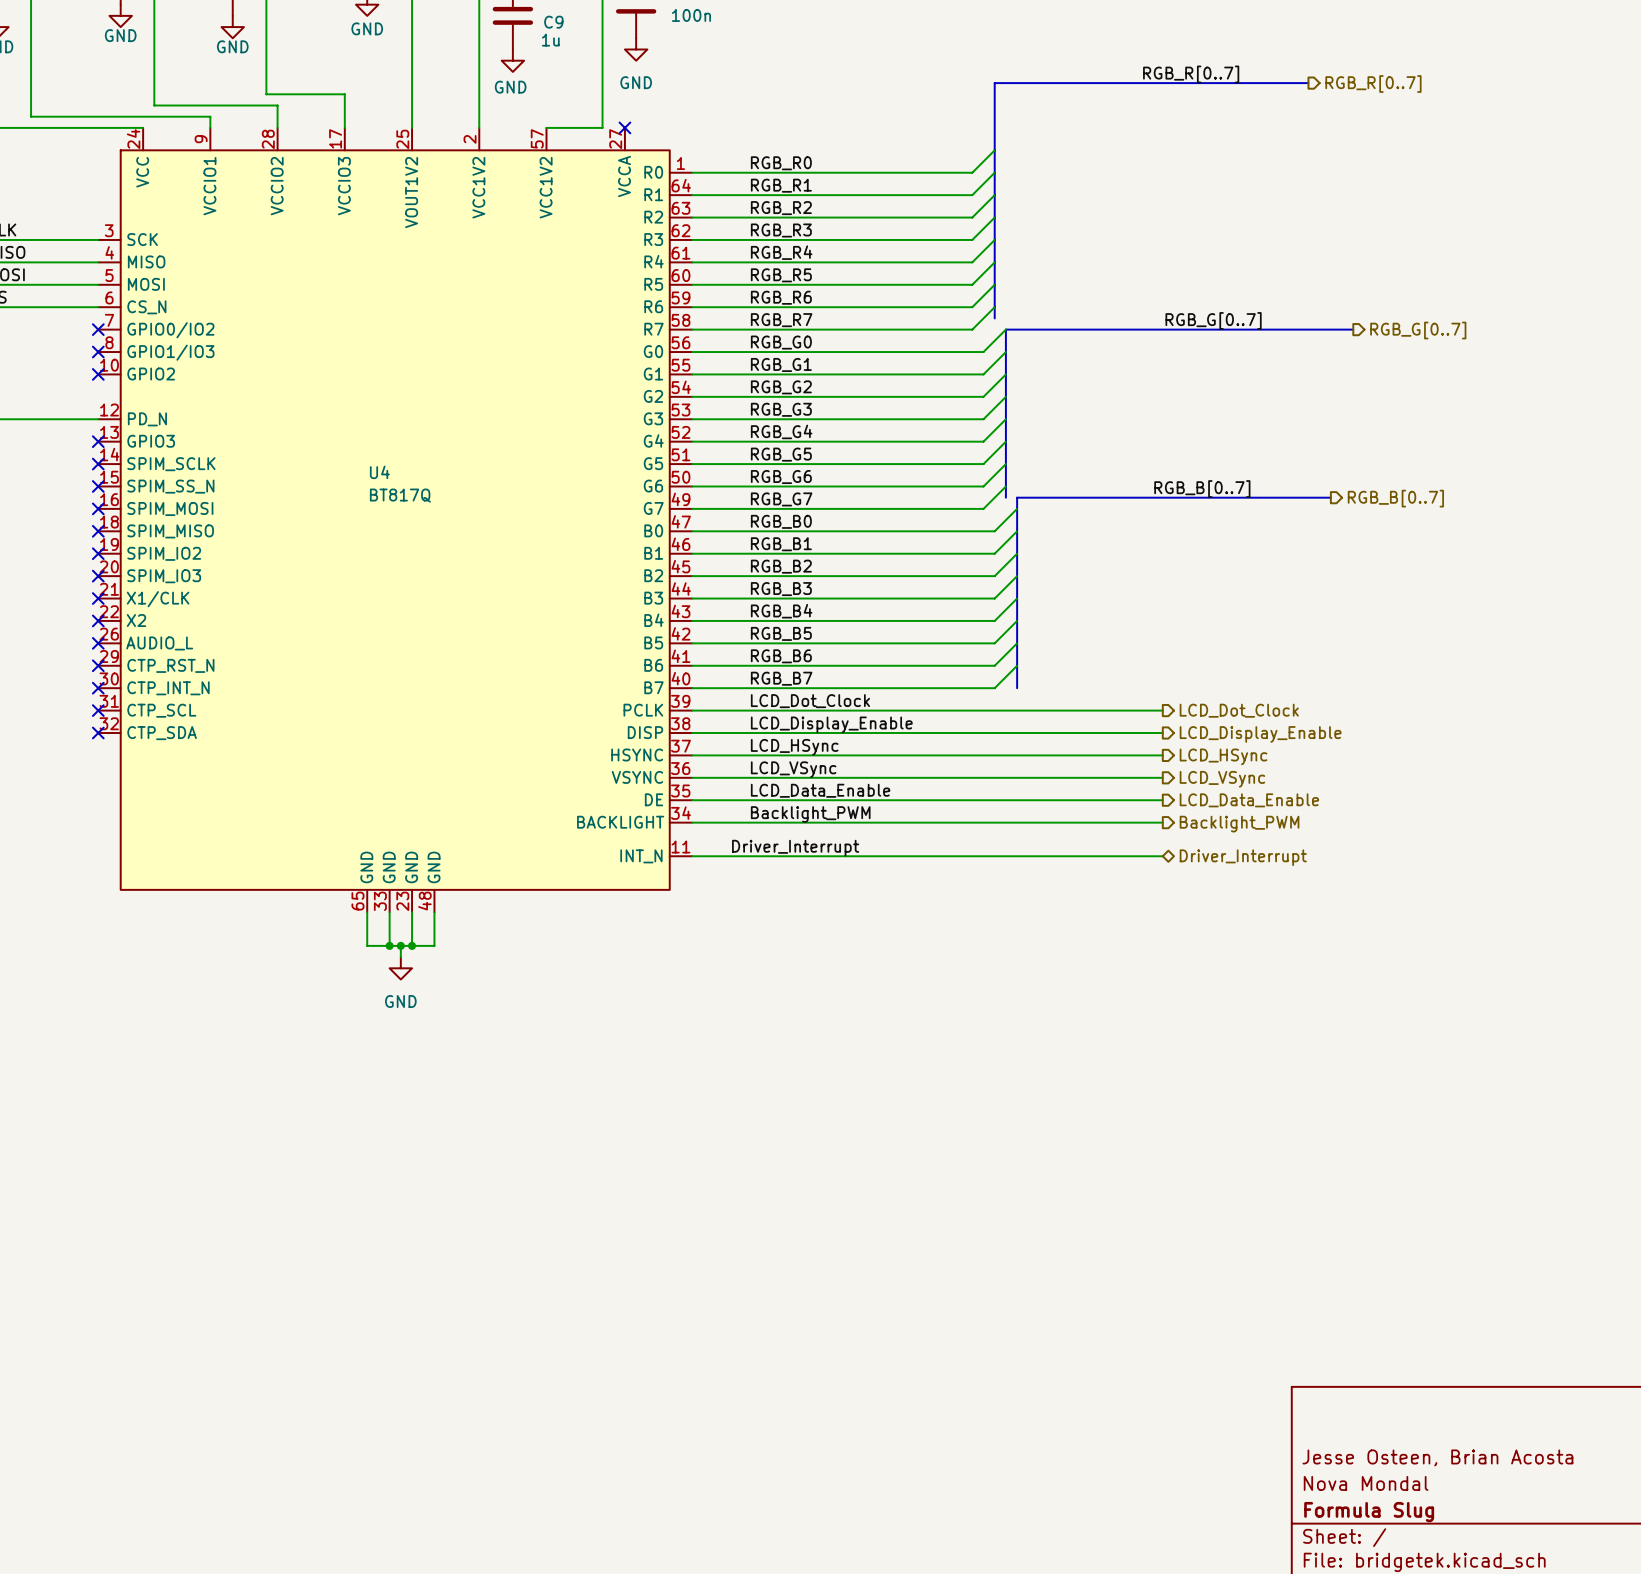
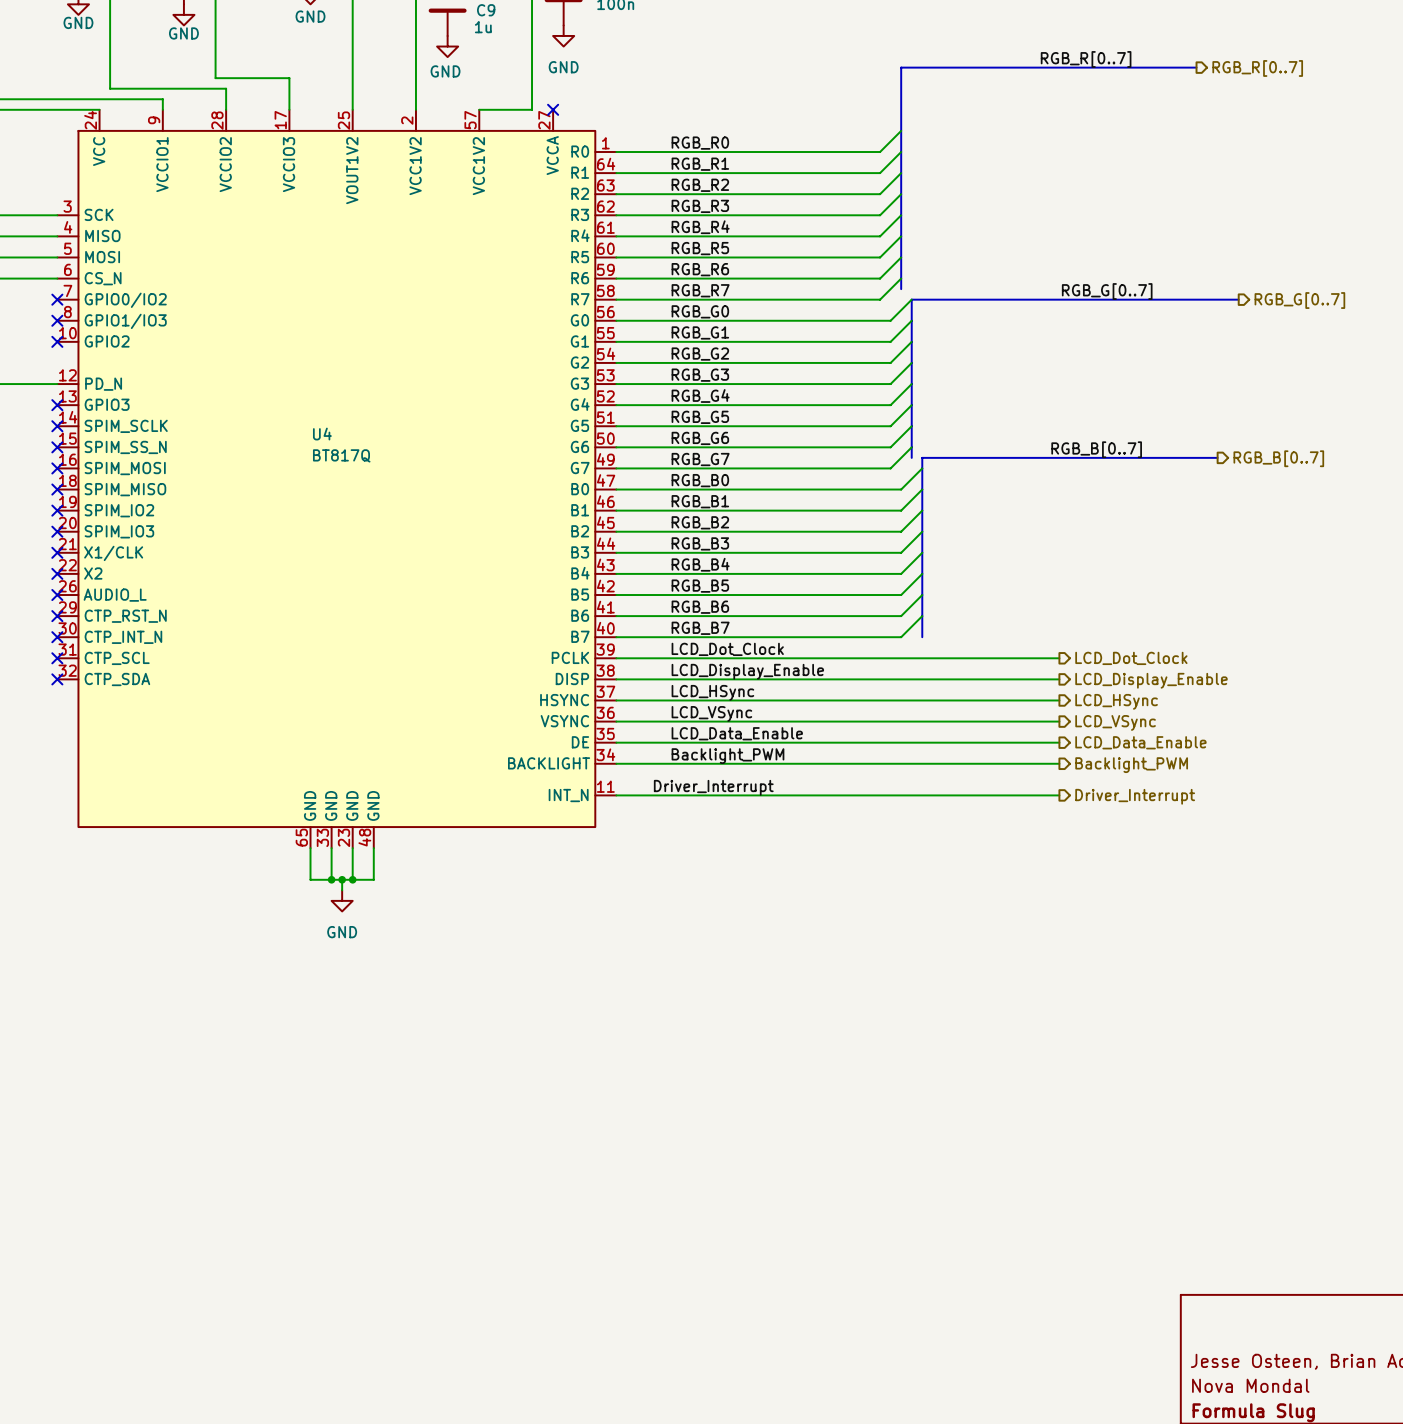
hierarchical label shape: bidirectional (1243, 857) -> output (1135, 796)

